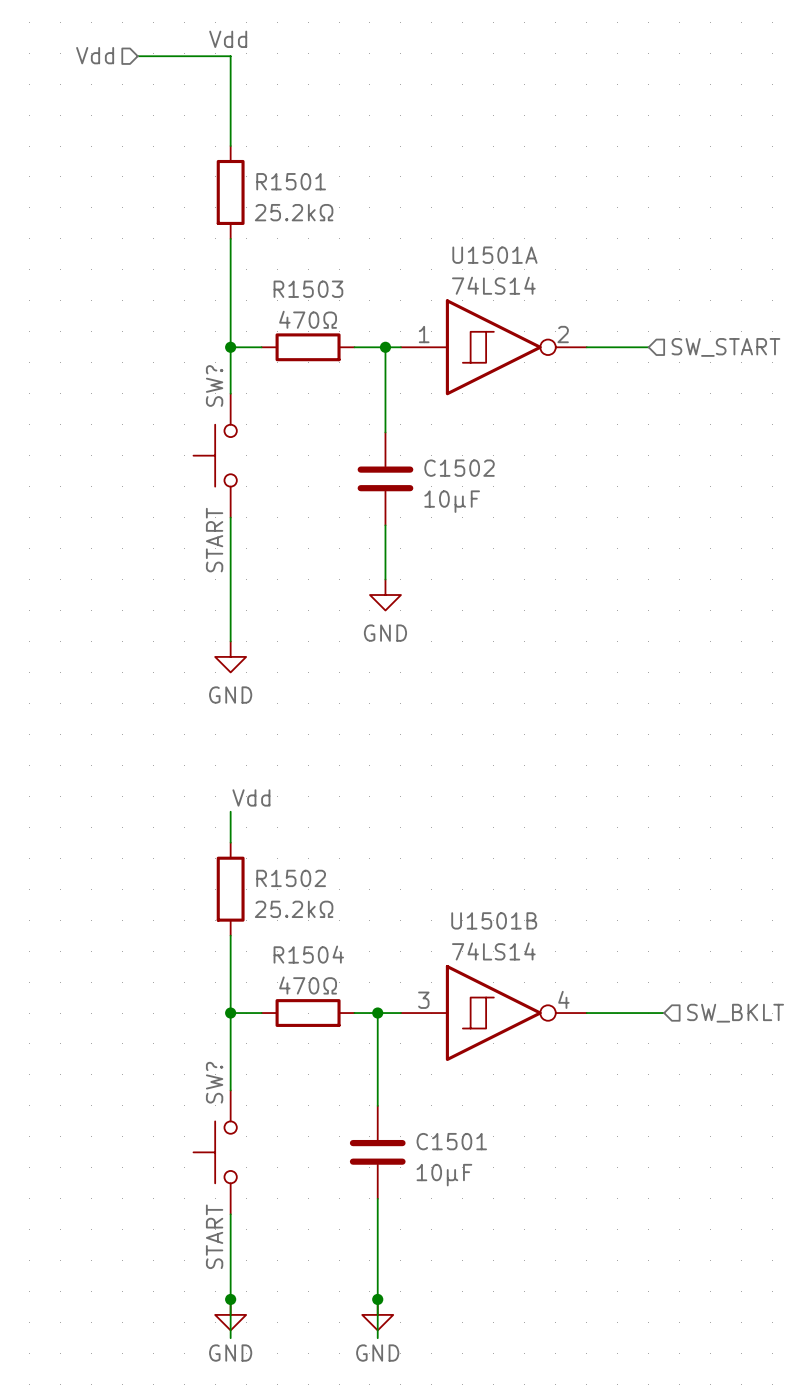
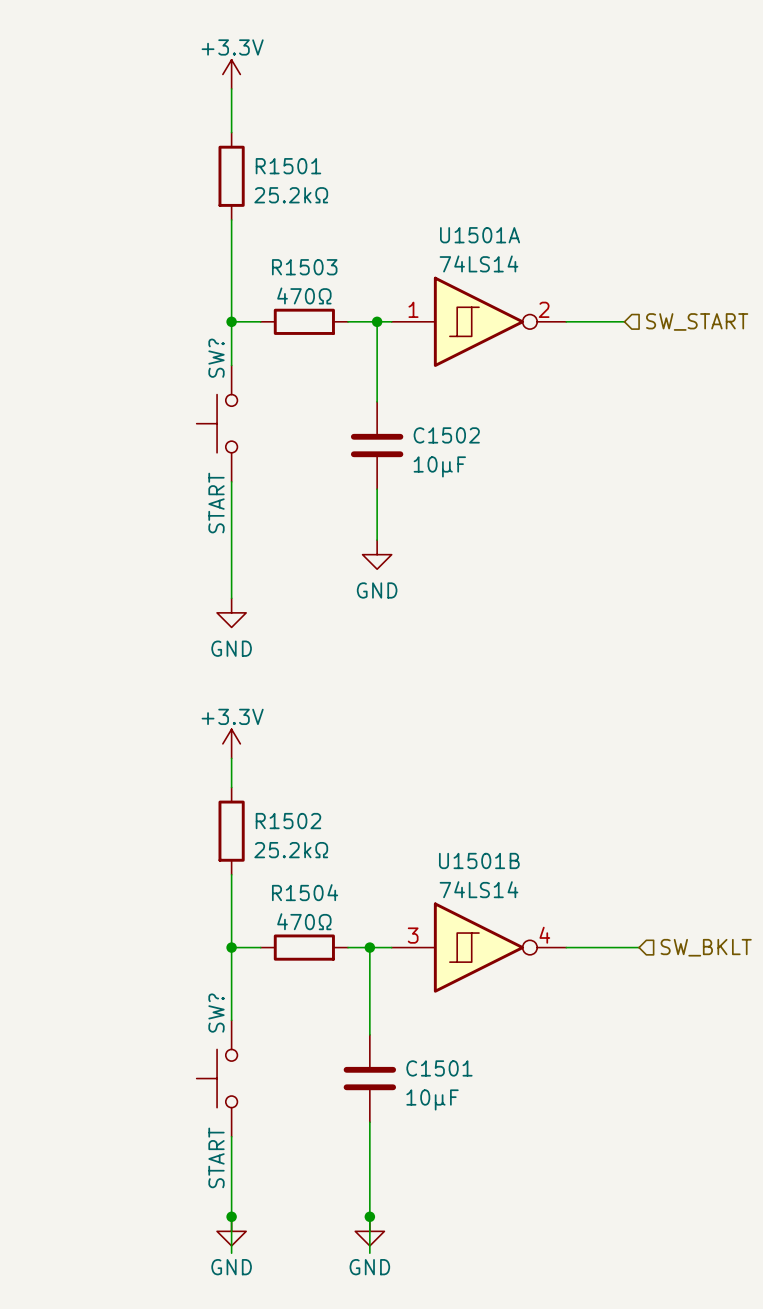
label: Vdd (228, 39) -> none
hierarchical label: Vdd (95, 55) -> none
wire: (137, 56) (230, 56) (230, 99) -> none
power symbol: none -> +3.3V (231, 74)
power symbol: none -> +3.3V (231, 743)
label: Vdd (251, 797) -> none

